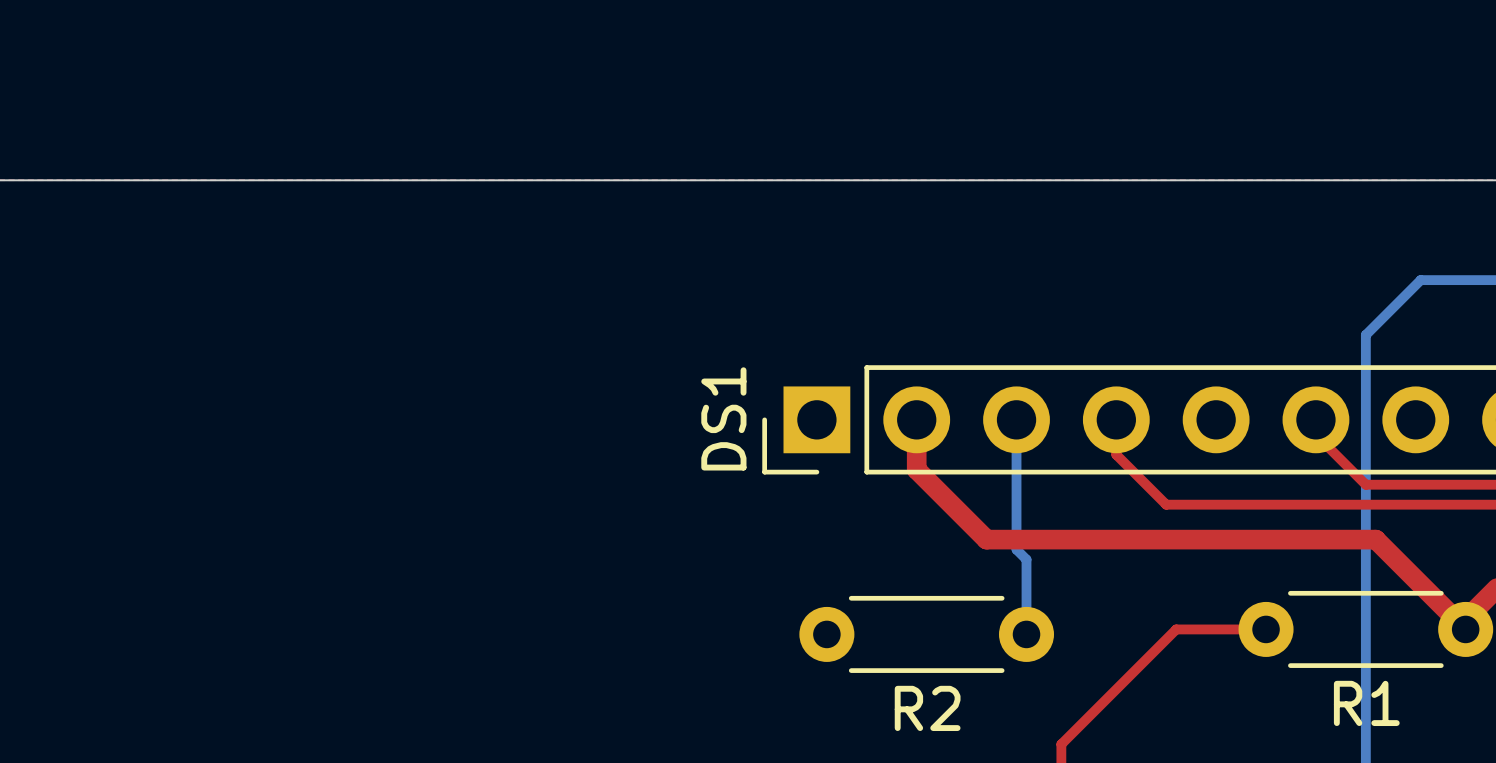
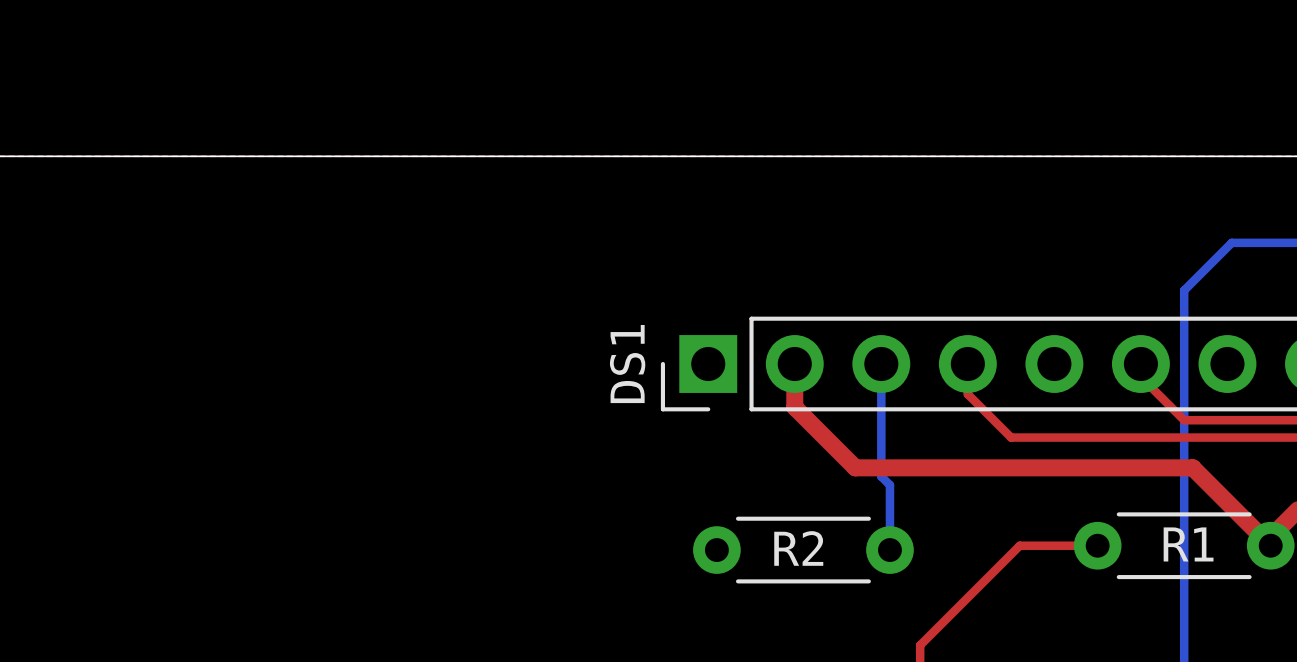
R1 name position: R1 (1366, 703) -> R1 (1188, 544)
R2 name position: R2 (927, 708) -> R2 (798, 548)

